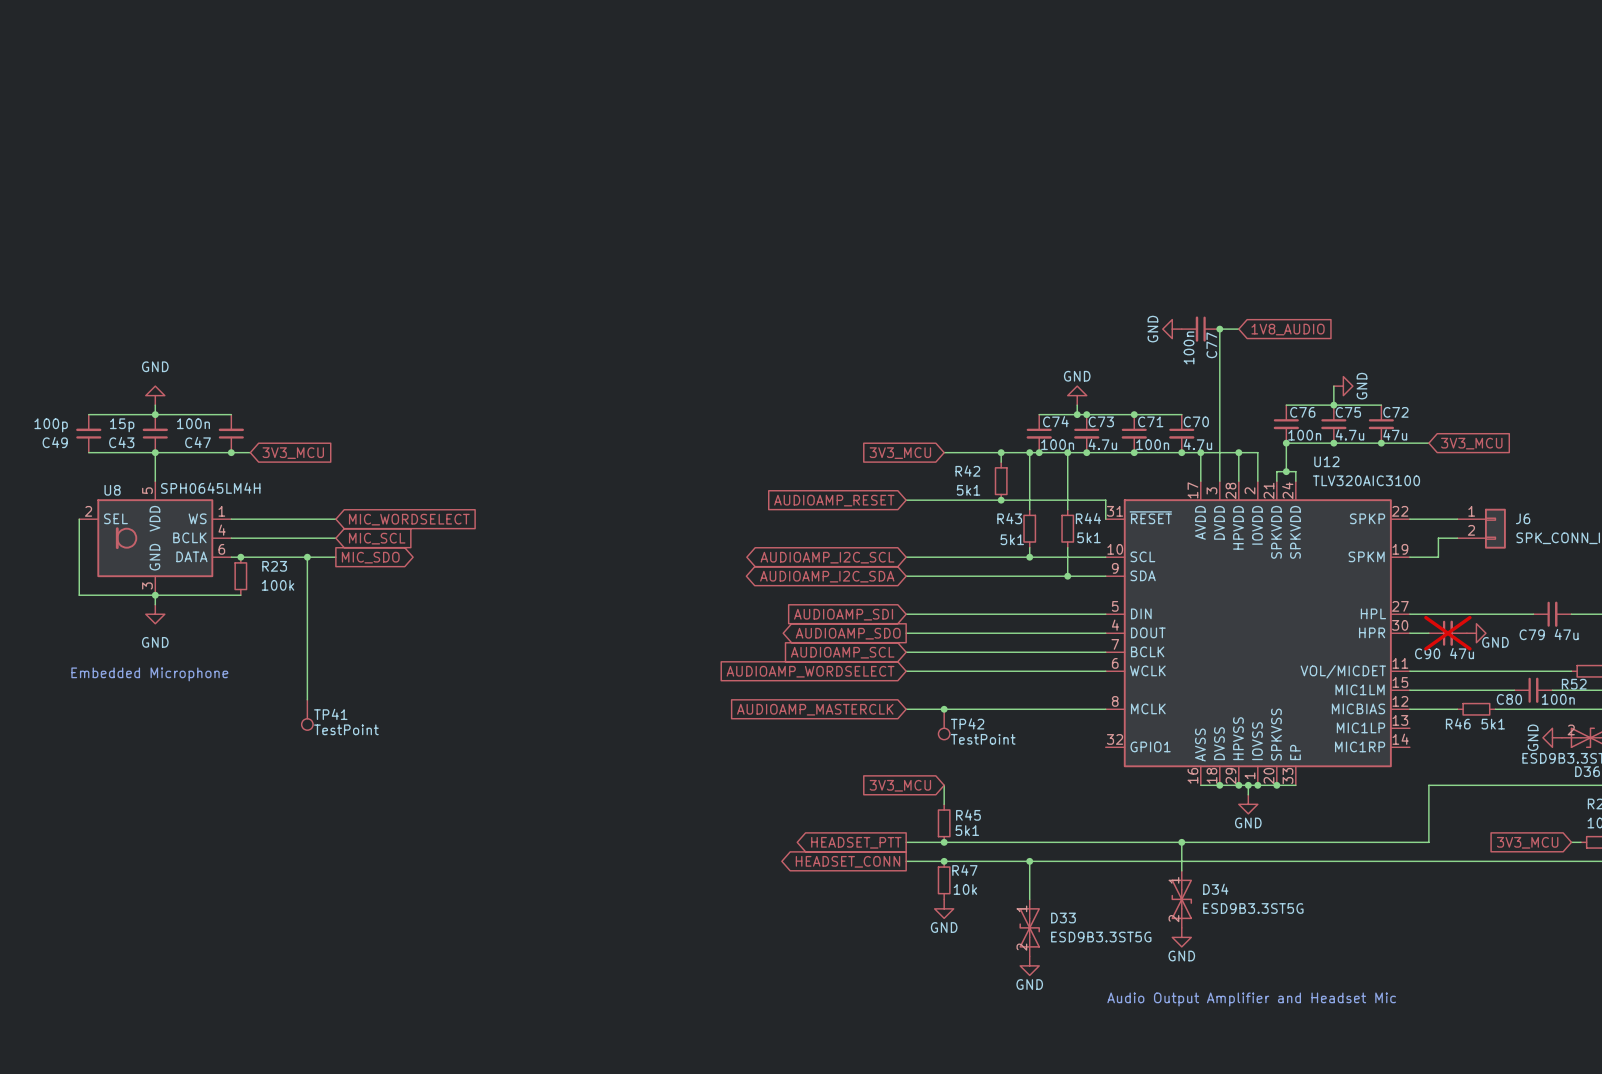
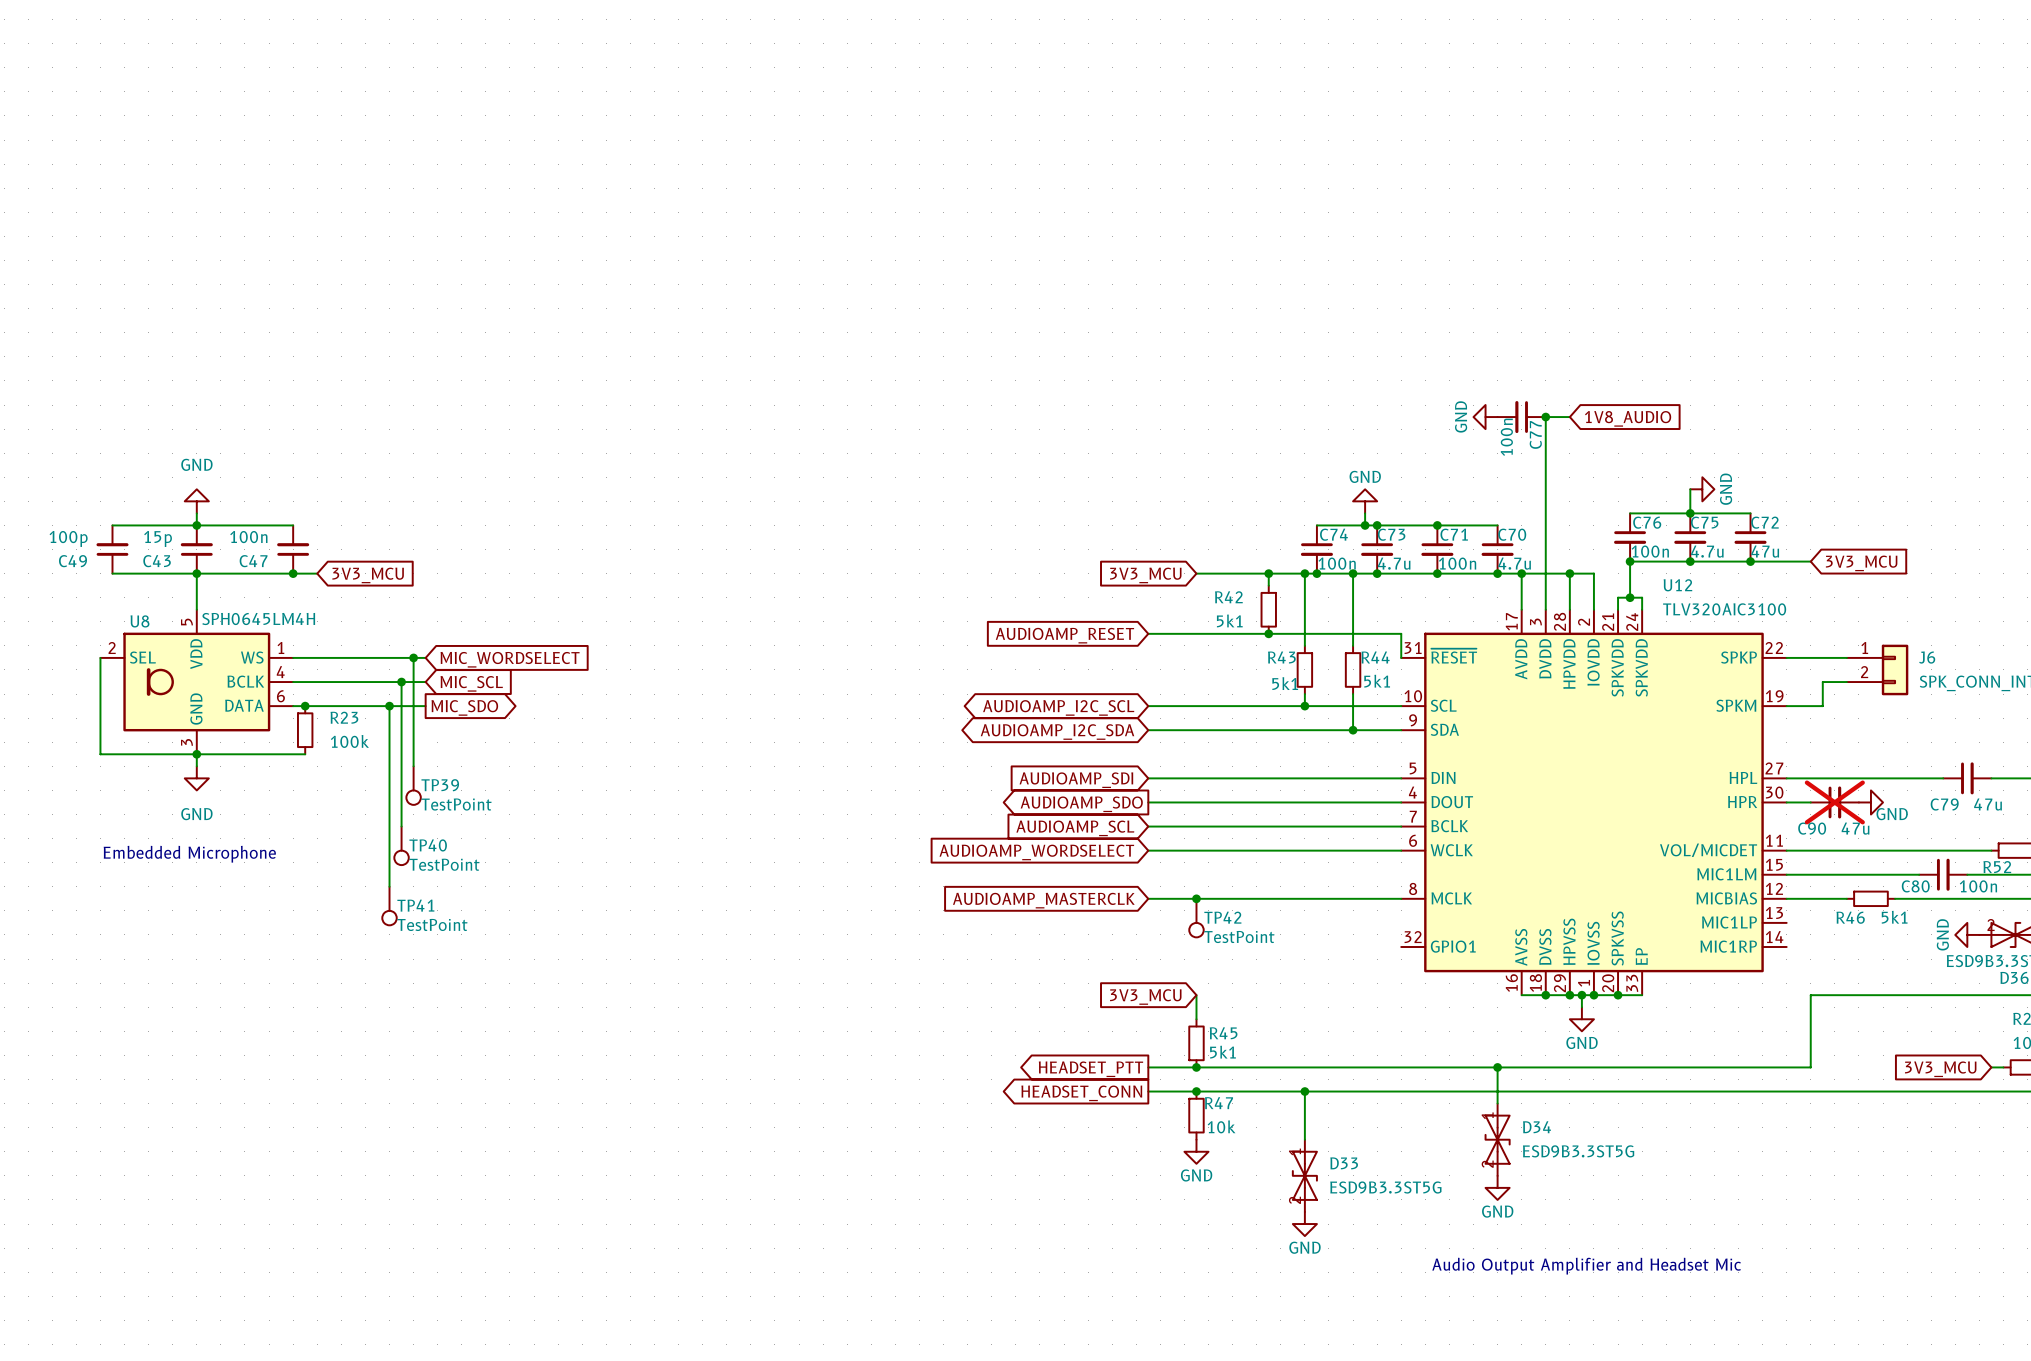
wire: none -> (413, 657) (413, 766)
junction: none -> (413, 657)
wire: none -> (401, 682) (401, 826)
junction: none -> (401, 682)
TP39: none -> TestPoint (413, 785)
TP40: none -> TestPoint (401, 845)

